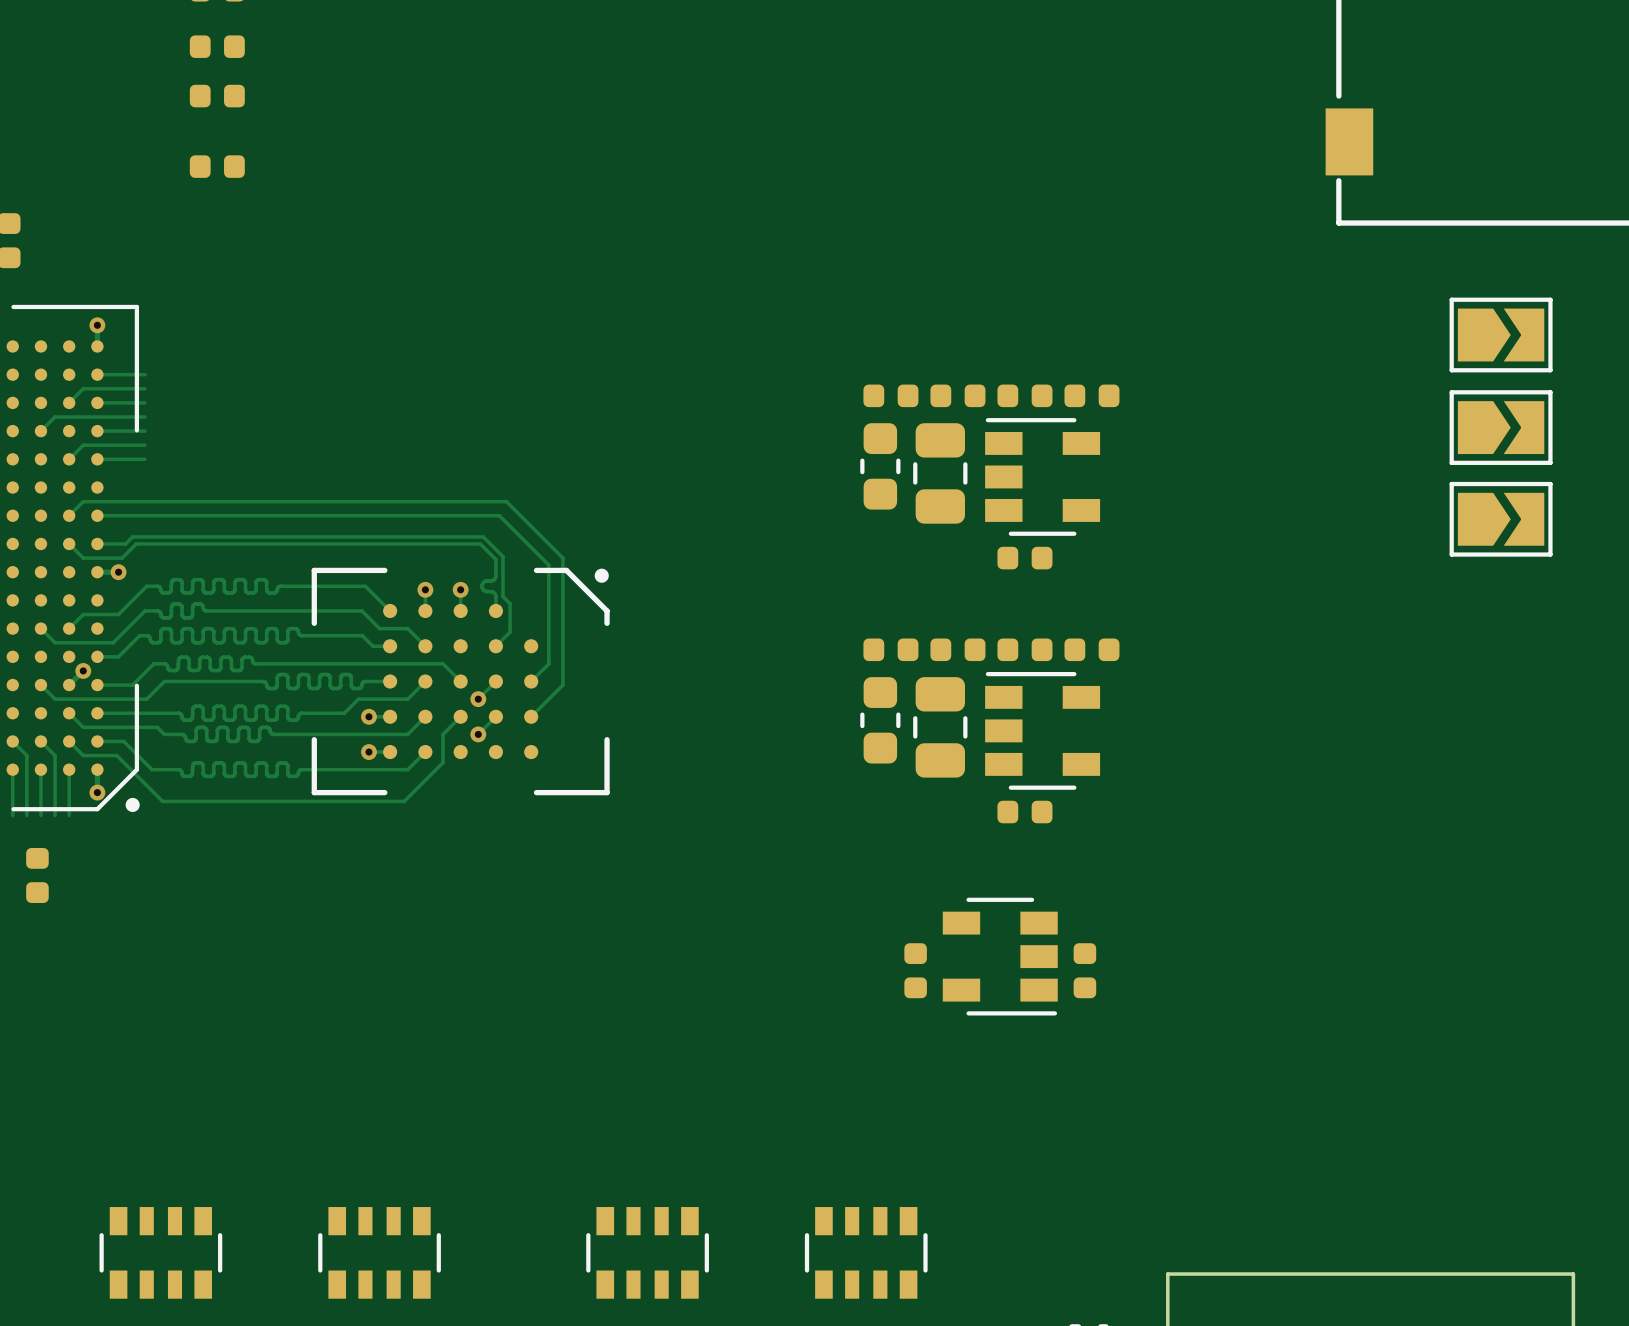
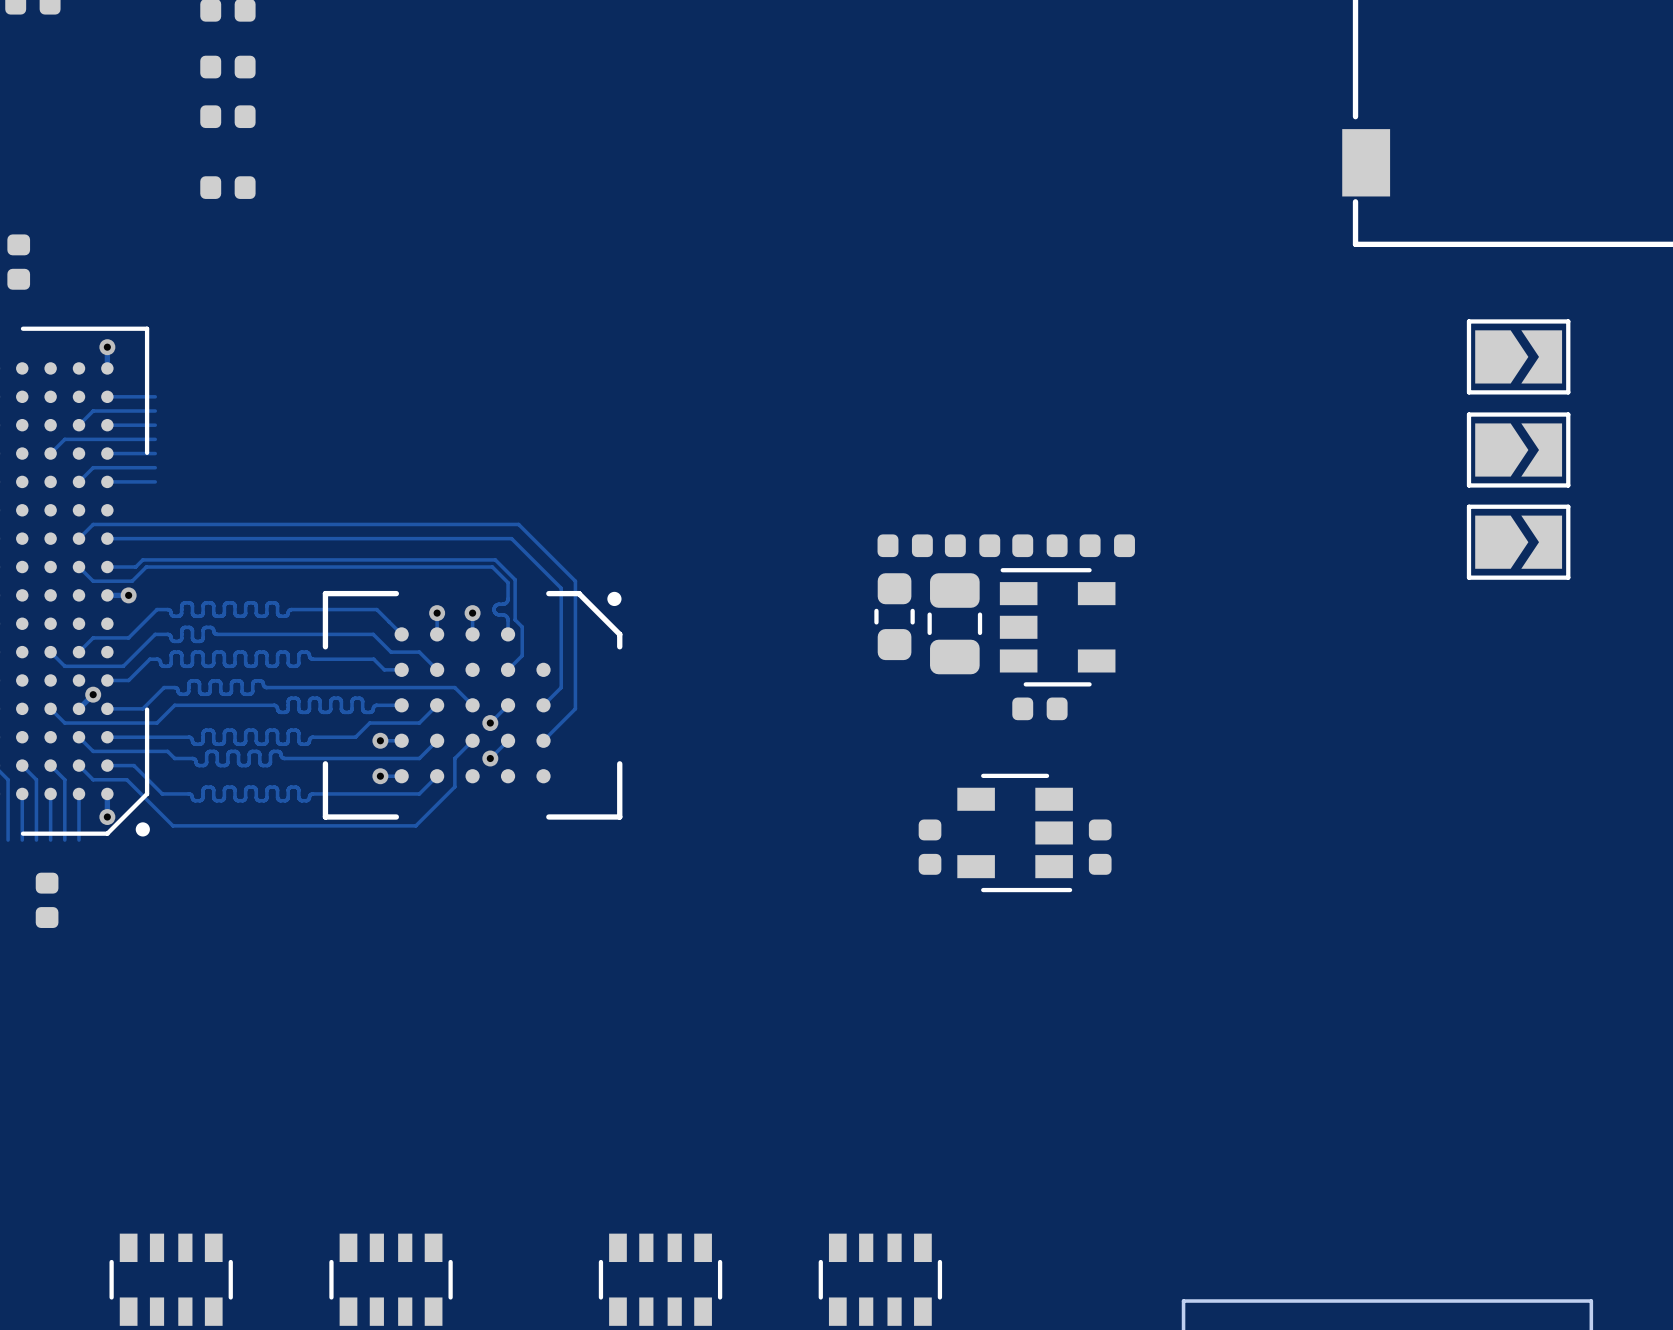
part: (890, 395) -> none
part: (957, 395) -> none
part: (1024, 395) -> none
part: (1091, 395) -> none
part: (880, 466) -> none
part: (940, 473) -> none
part: (1042, 476) -> none
part: none -> (905, 545)
part: none -> (972, 545)
part: none -> (1107, 545)
part position: (1024, 558) -> (1039, 545)
part: none -> (894, 616)
part: none -> (954, 623)
part: none -> (1057, 627)
part: (890, 649) -> none
part: (957, 649) -> none
part position: (1024, 649) -> (1039, 708)
part: (1091, 649) -> none
part: (880, 720) -> none
part: (940, 727) -> none
part: (1042, 730) -> none
part footprint: [997, 800, 1053, 824] -> [957, 773, 1073, 893]
part: none -> (930, 847)
part: none -> (1100, 847)
part: (1000, 956) -> none
part: (915, 970) -> none
part: (1084, 970) -> none

